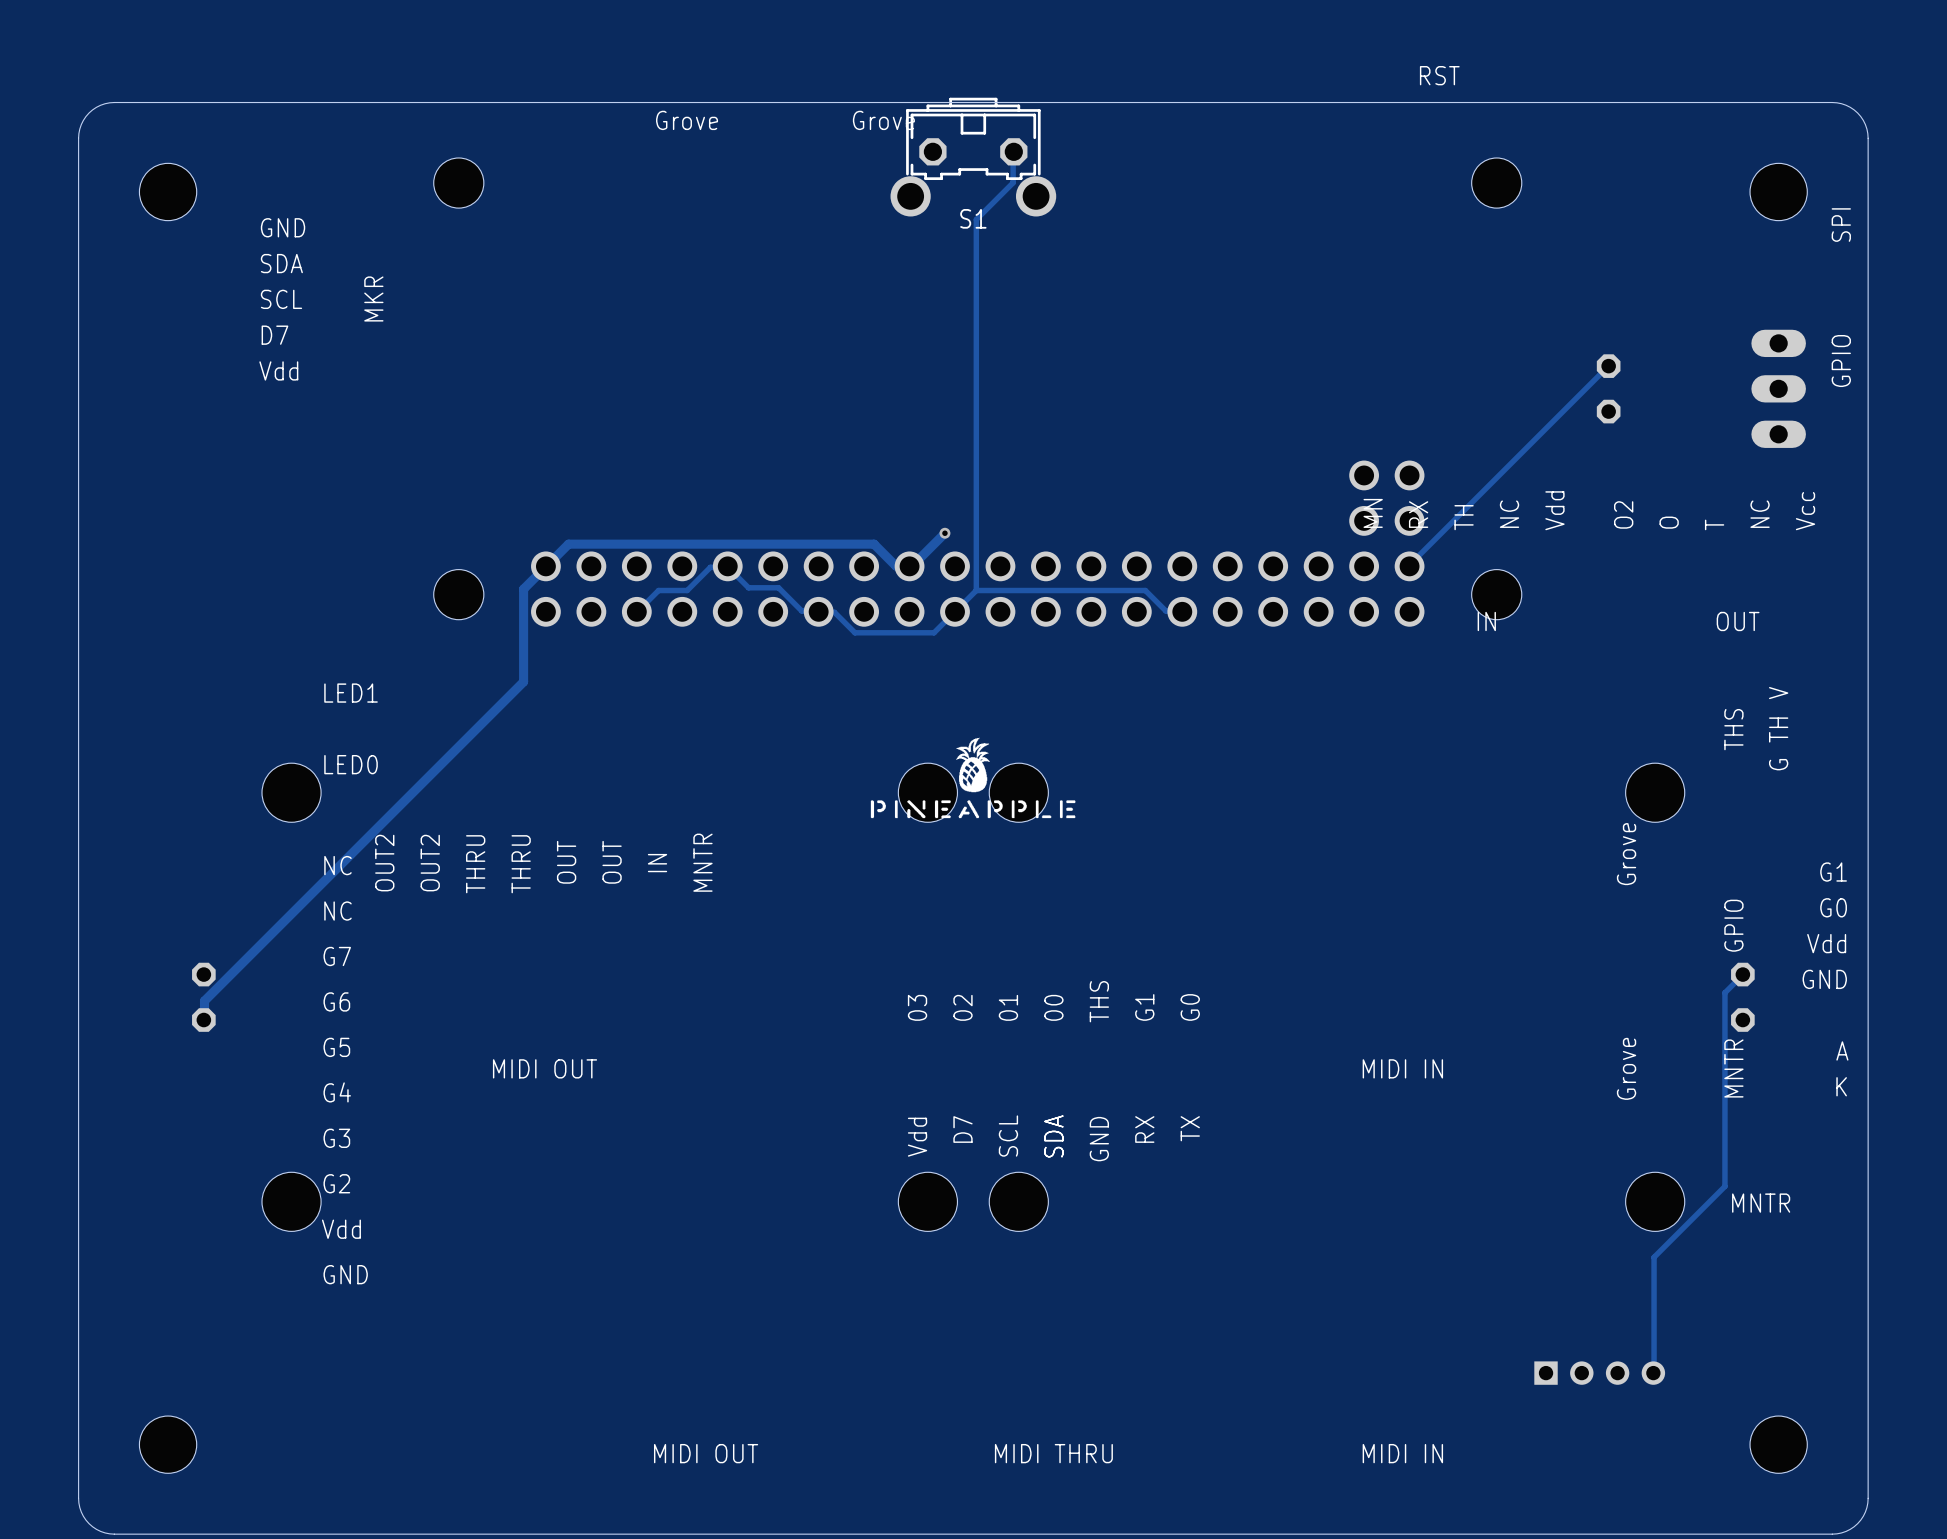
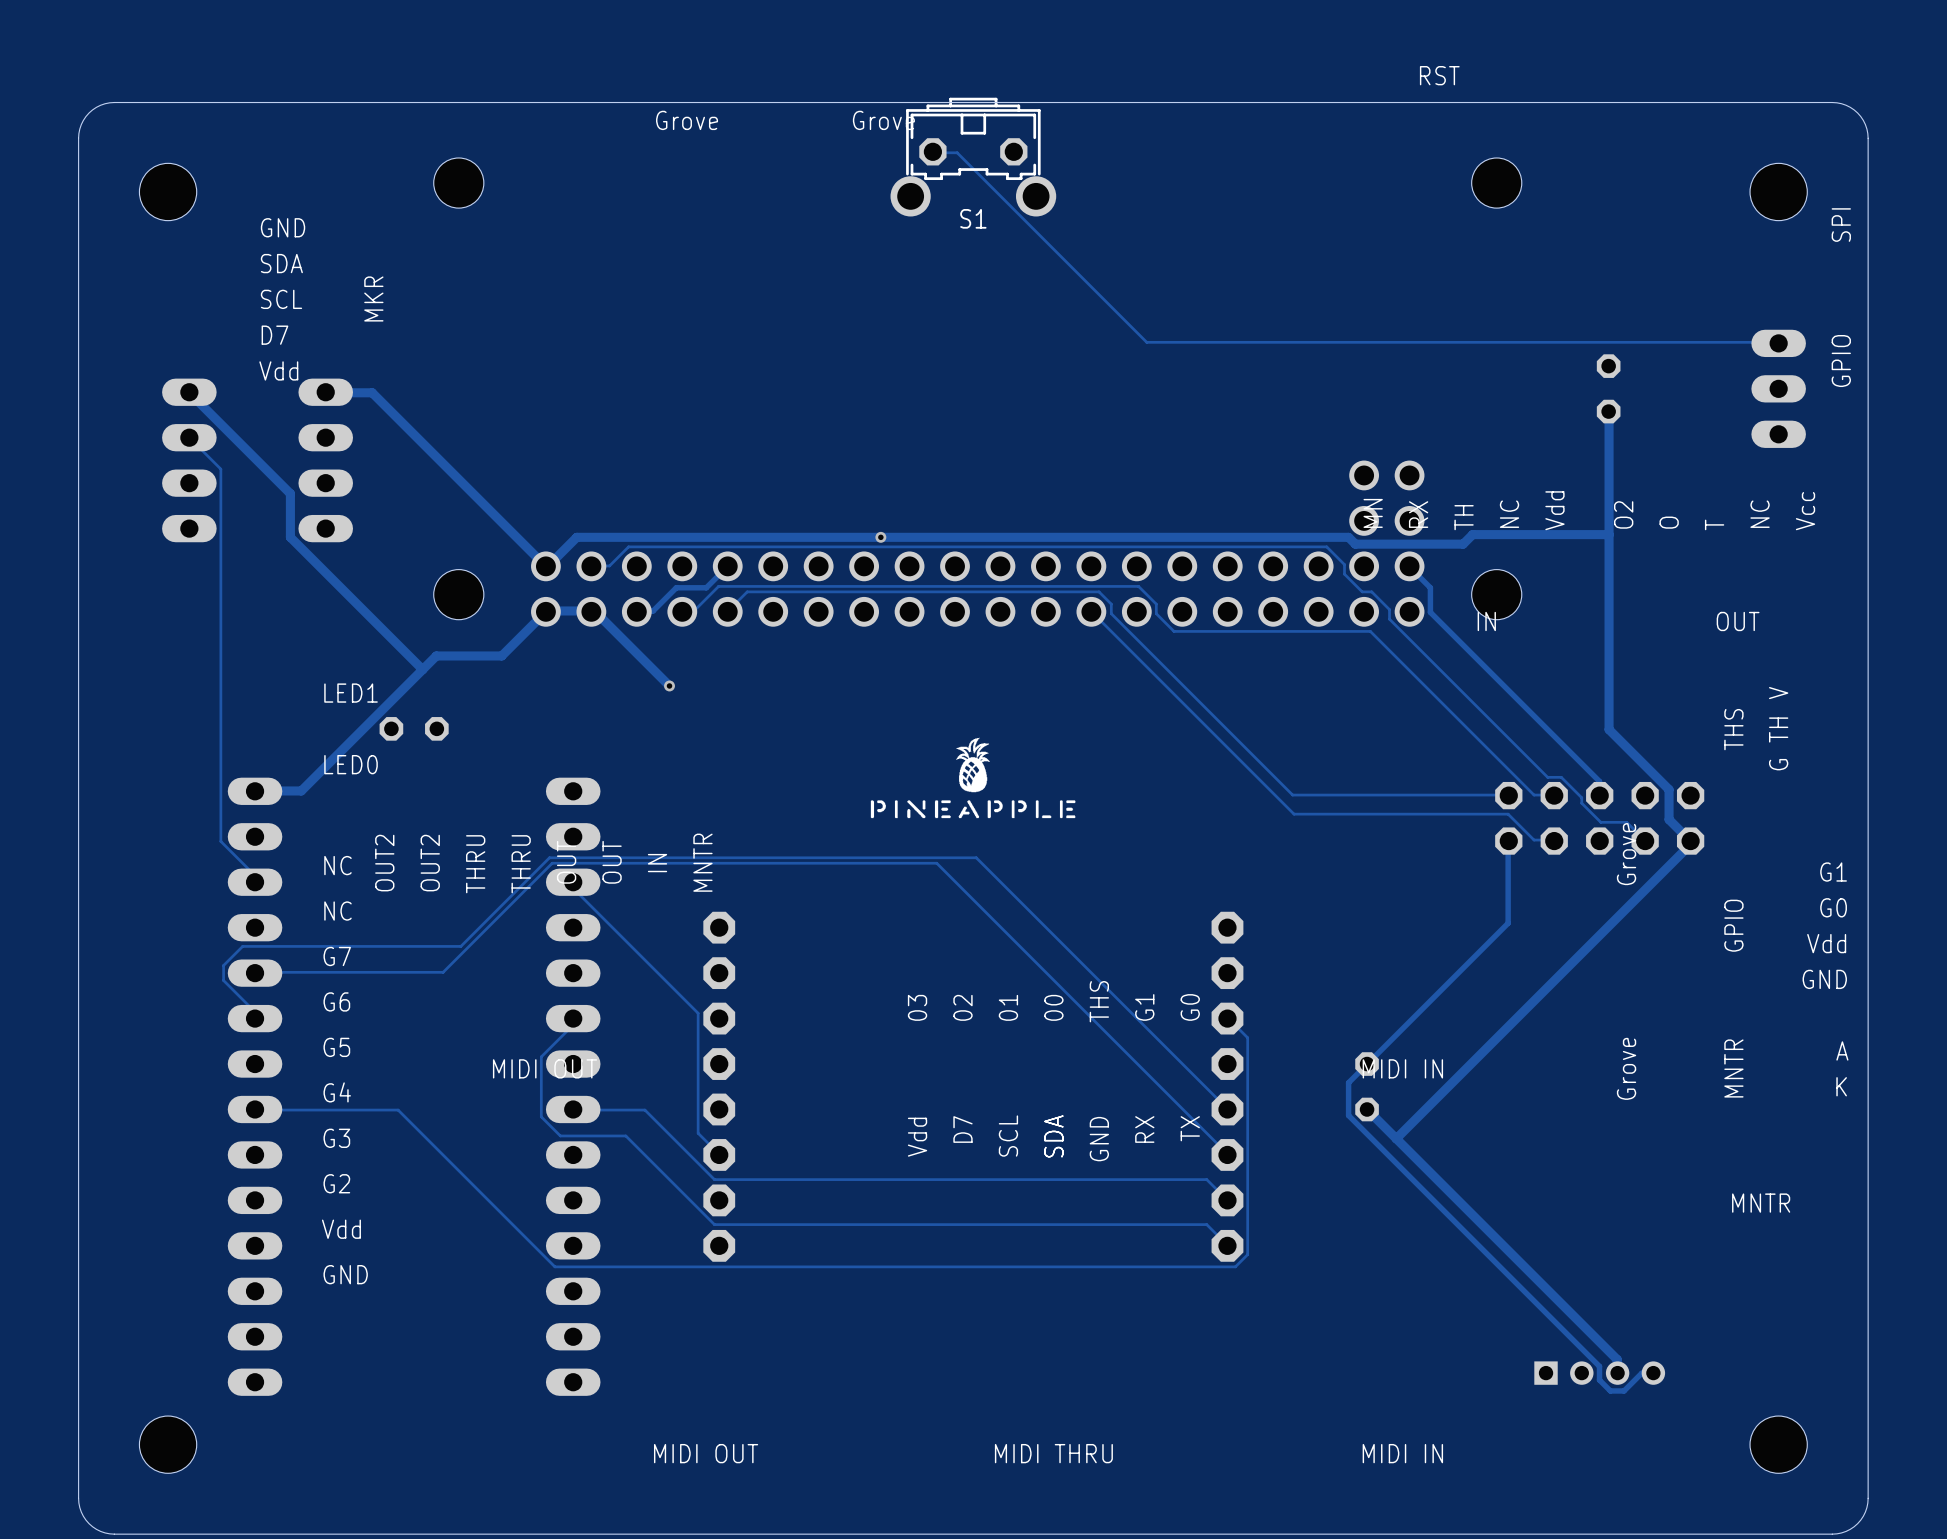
track: none -> (932, 151) (957, 152) (1146, 342) (1778, 343)
track: (1013, 151) (1013, 182) (976, 219) (976, 590) -> none
track: (1608, 366) (1409, 566) -> (1599, 795) (1599, 781) (1430, 612) (1430, 587) (1409, 566)
track: none -> (189, 392) (290, 493) (290, 537) (422, 669)
track: none -> (325, 392) (372, 392) (545, 566) (576, 537) (1348, 537) (1355, 544) (1463, 544) (1472, 534) (1609, 534)
track: none -> (1608, 411) (1609, 729) (1669, 789) (1669, 819) (1690, 841) (1689, 845) (1396, 1138)
track: none -> (189, 437) (220, 469) (220, 841) (254, 875) (255, 882)
part: none -> (189, 460)
part: none -> (325, 460)
track: (944, 533) (909, 566) (895, 565) (874, 544) (568, 544) (523, 589) (523, 681) (204, 1000) (203, 1020) -> none
via position: (944, 533) -> (880, 537)
track: none -> (591, 566) (609, 565) (628, 546) (1326, 546) (1344, 564) (1344, 574) (1362, 591) (1371, 591) (1389, 609) (1389, 619) (1547, 777) (1561, 777) (1581, 797) (1581, 803) (1600, 822) (1626, 822) (1645, 841)
track: (976, 590) (934, 632) (854, 632) (834, 612) (801, 610) (778, 587) (748, 587) (727, 566) (710, 567) (687, 590) (658, 590) (638, 610) -> (727, 566) (706, 587) (676, 587) (653, 610) (638, 610)
track: (976, 590) (1145, 590) (1165, 610) (1182, 611) -> none
track: none -> (682, 611) (694, 610) (718, 586) (1138, 586) (1156, 604) (1156, 613) (1174, 631) (1370, 631) (1534, 795) (1554, 795)
track: none -> (727, 611) (747, 591) (1099, 591) (1111, 604) (1111, 613) (1292, 795) (1508, 795)
track: none -> (1091, 611) (1294, 814) (1508, 814) (1534, 840) (1554, 841)
track: none -> (669, 685) (595, 612) (545, 611) (501, 655) (436, 655) (301, 790) (255, 791)
via: none -> (669, 685)
part: (291, 792) -> none
part: (927, 792) -> none
part: (1018, 792) -> none
part: (1655, 792) -> none
part: none -> (1599, 818)
track: none -> (573, 882) (574, 889) (698, 1013) (698, 1133) (719, 1154)
track: none -> (255, 973) (443, 972) (552, 863) (936, 863) (1227, 1154)
track: (1742, 974) (1724, 992) (1724, 1186) (1654, 1257) (1653, 1373) -> (1508, 841) (1508, 923) (1348, 1082) (1348, 1115) (1599, 1366) (1599, 1380) (1610, 1390) (1624, 1390) (1641, 1373) (1653, 1373)
part rotation: 0° (203, 997) -> 90° clockwise (414, 728)
part position: (203, 997) -> (414, 728)
part position: (1742, 997) -> (1367, 1086)
track: none -> (255, 1018) (254, 1011) (223, 980) (223, 965) (242, 946) (460, 946) (549, 857) (976, 857) (1227, 1109)
track: none -> (573, 1018) (572, 1025) (541, 1056) (541, 1116) (560, 1135) (625, 1135) (714, 1224) (1206, 1224) (1227, 1245)
track: none -> (1227, 1018) (1247, 1037) (1247, 1254) (1235, 1266) (554, 1266) (398, 1110) (255, 1109)
part: none -> (255, 1086)
part: none -> (573, 1086)
part: none -> (719, 1086)
part: none -> (1227, 1086)
track: none -> (573, 1109) (644, 1110) (714, 1179) (1206, 1179) (1227, 1200)
track: none -> (1367, 1109) (1617, 1359) (1617, 1373)
part: (291, 1201) -> none
part: (927, 1201) -> none
part: (1018, 1201) -> none
part: (1655, 1201) -> none

